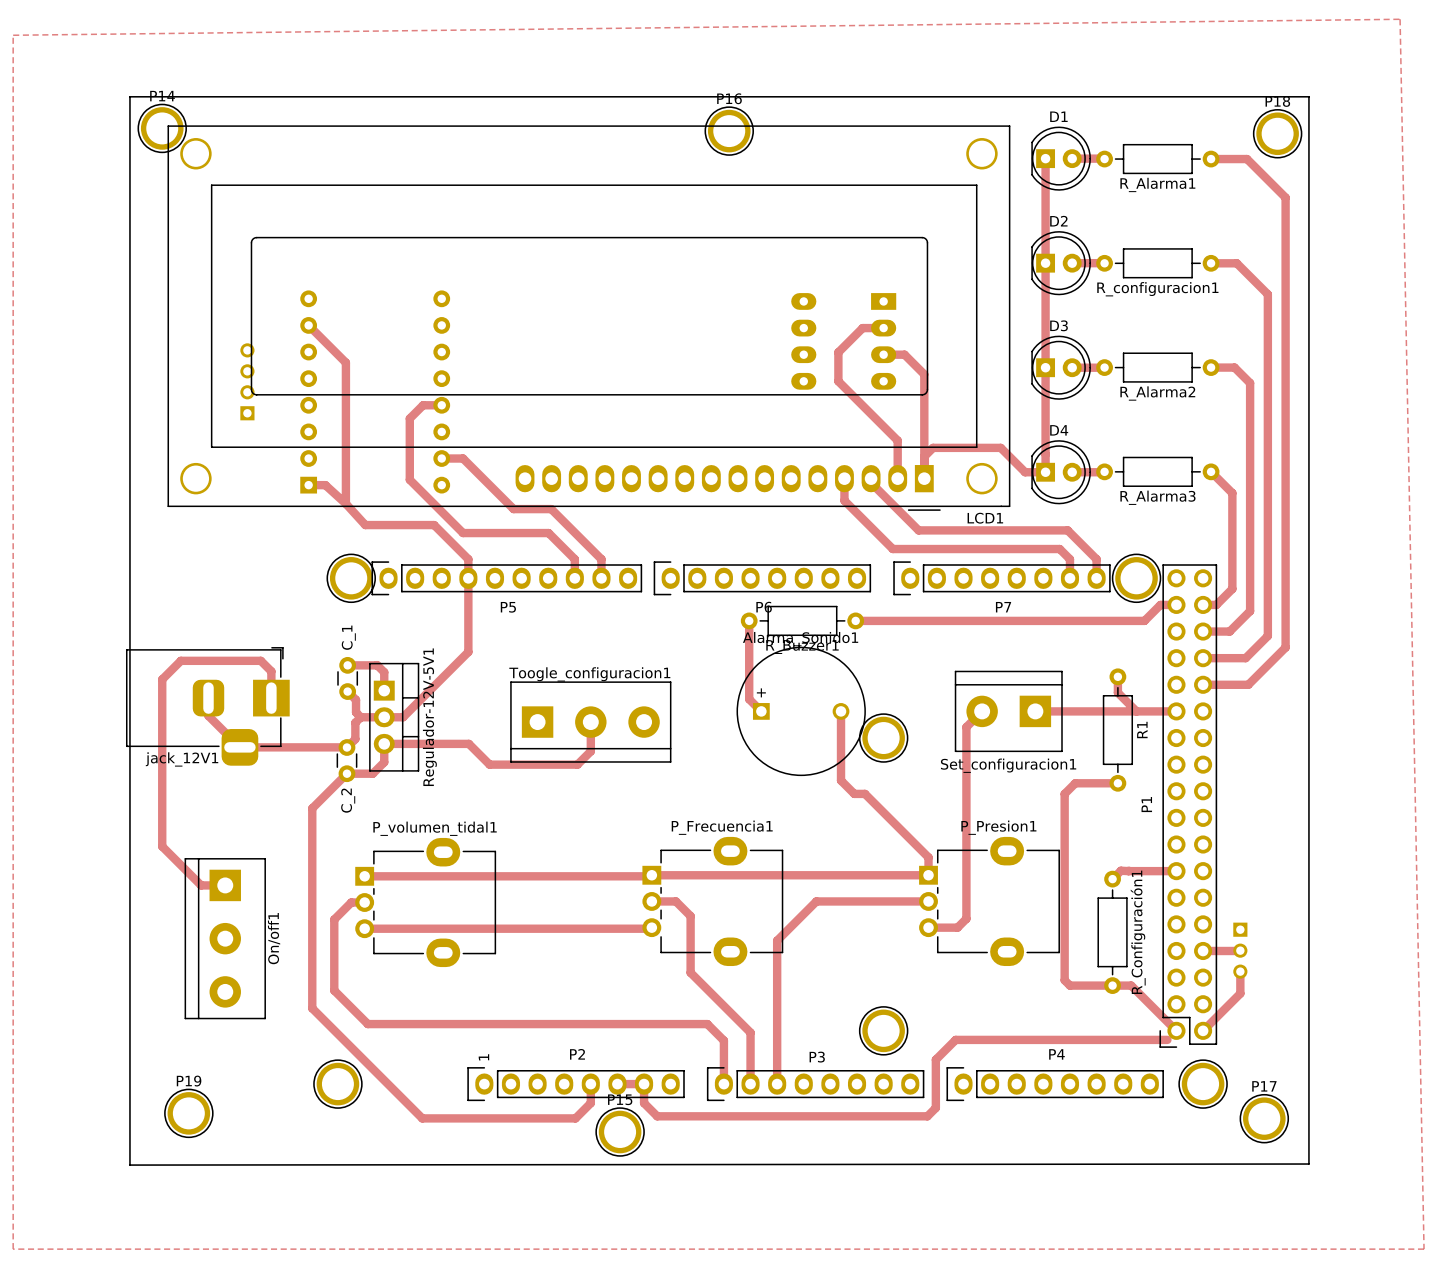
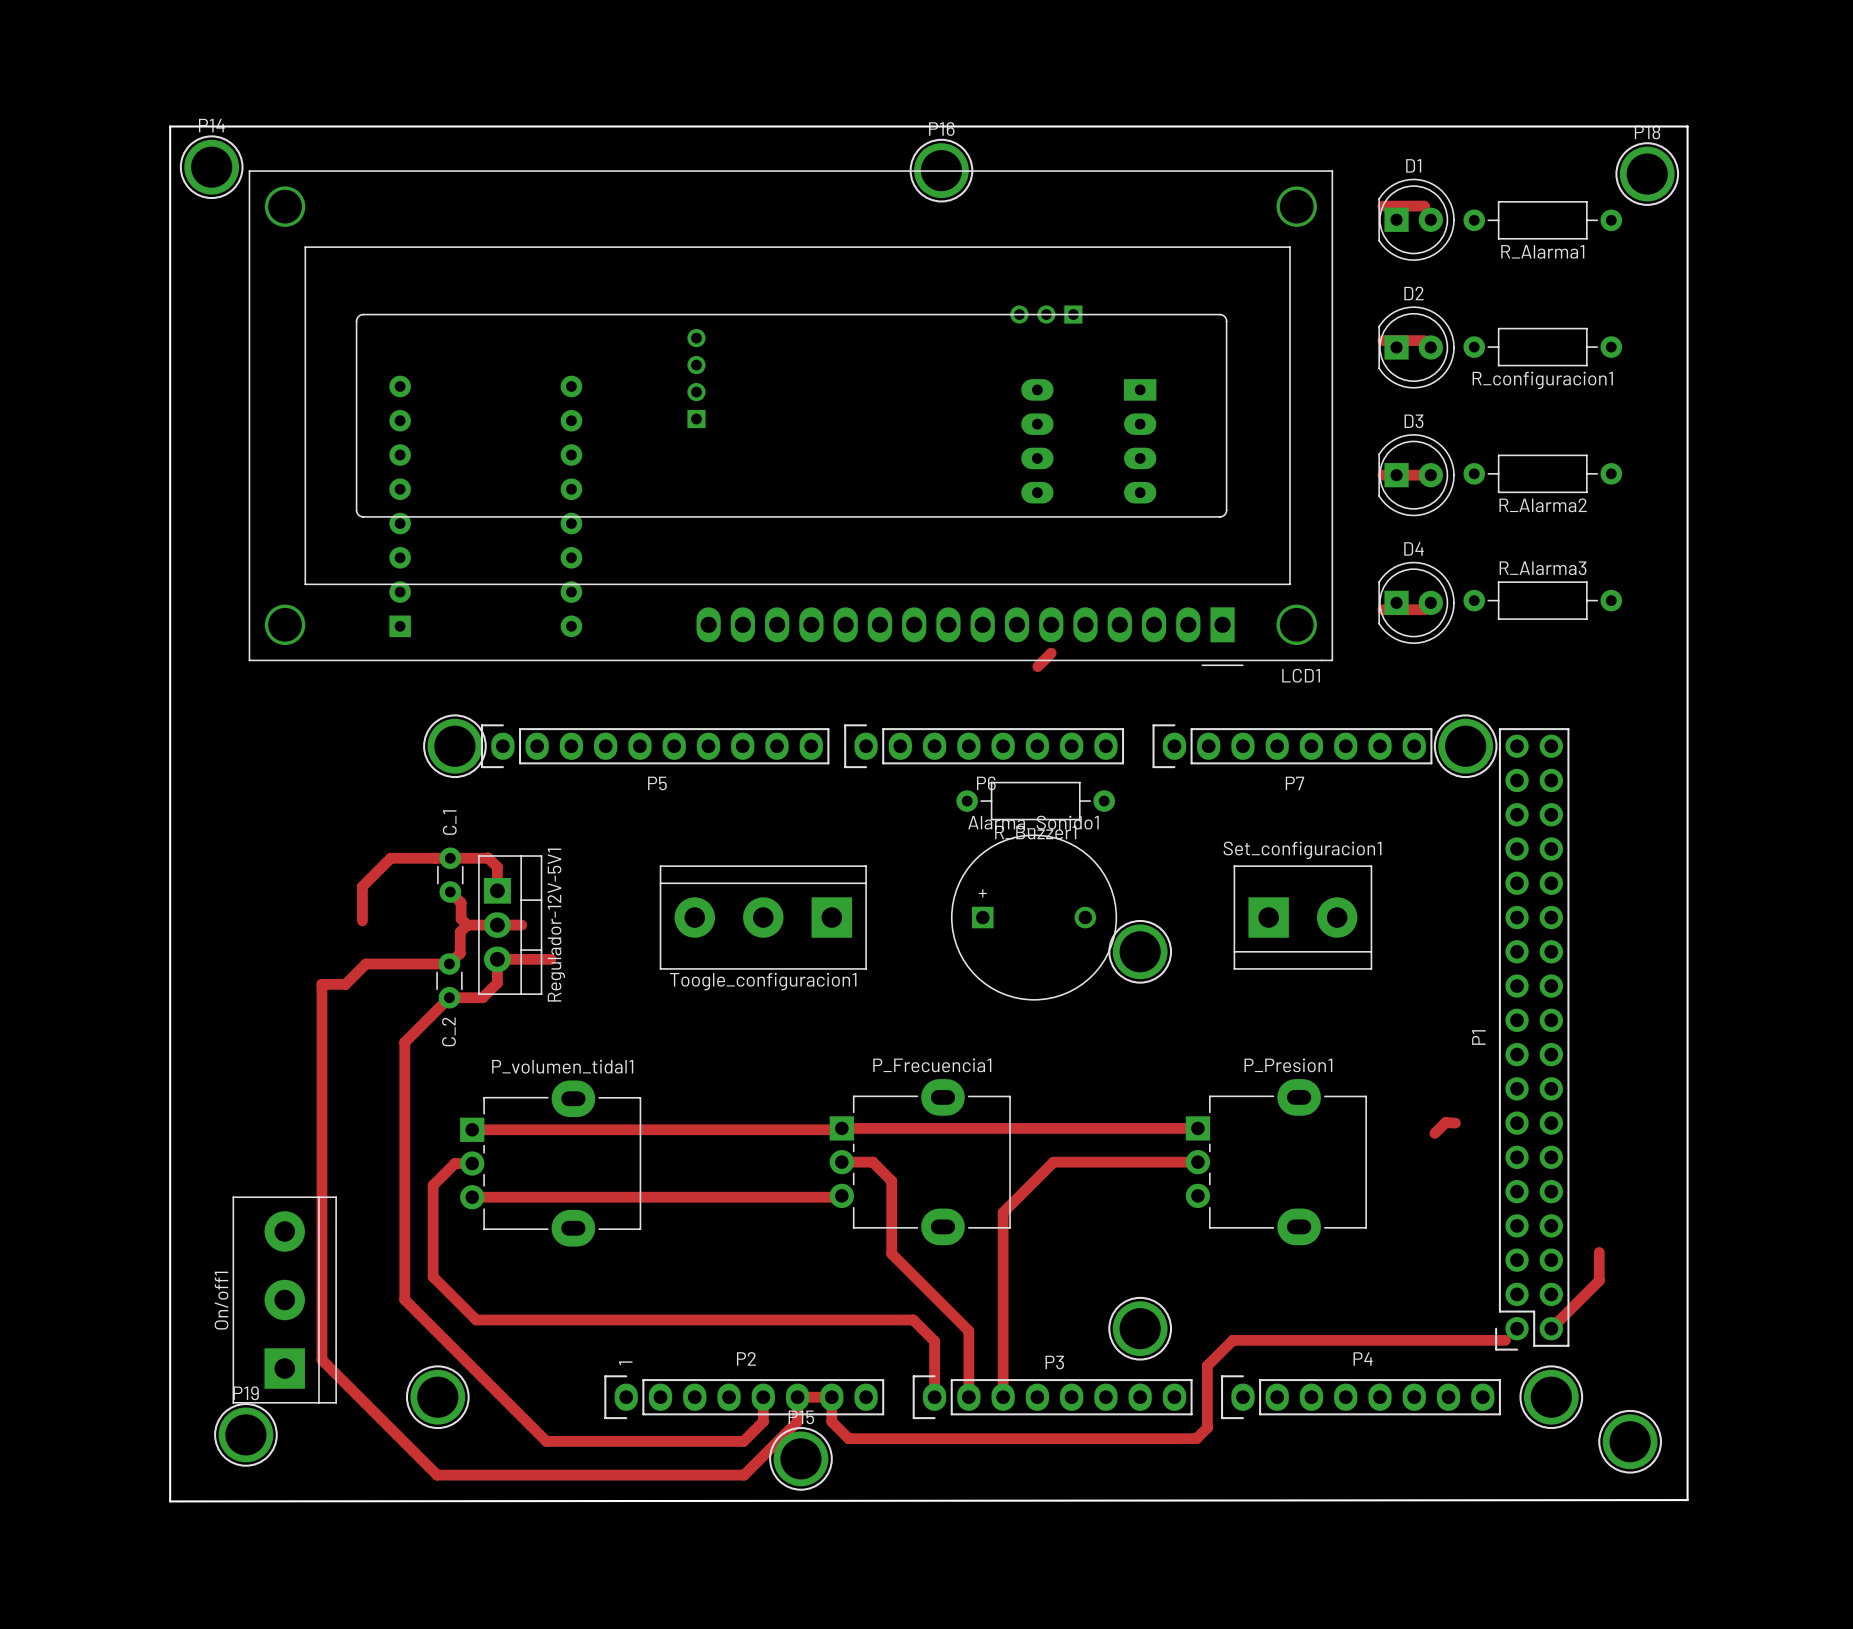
zone outline: (1400, 19) (13, 35) (13, 1249) (1424, 1249) (1400, 19) -> none
track: (1045, 158) (1045, 472) (1025, 472) (1000, 447) (933, 447) (924, 456) -> none
D1 position: (1061, 158) -> (1416, 219)
R_Alarma1 position: (1157, 159) -> (1542, 220)
track: (1211, 159) (1247, 159) (1285, 197) (1285, 647) (1248, 684) (1203, 684) -> none
part: none -> (1046, 314)
D2 position: (1061, 263) -> (1416, 347)
R_configuracion1 position: (1157, 263) -> (1542, 347)
track: (1211, 263) (1236, 263) (1267, 294) (1267, 635) (1245, 658) (1203, 658) -> none
part: none -> (696, 378)
LCD1 position: (588, 318) -> (790, 418)
track: (308, 325) (345, 362) (345, 503) -> none
track: (883, 328) (862, 328) (838, 352) (838, 381) (897, 440) (897, 478) -> none
track: (883, 354) (904, 354) (924, 374) (924, 478) -> none
D3 position: (1061, 367) -> (1416, 475)
R_Alarma2 position: (1157, 367) -> (1542, 473)
track: (1211, 367) (1234, 367) (1250, 383) (1250, 611) (1229, 631) (1203, 631) -> none
part: (247, 381) -> none
track: (441, 405) (423, 405) (409, 418) (409, 479) (463, 533) (548, 533) (574, 559) (574, 578) -> none
track: (441, 458) (463, 458) (513, 509) (551, 509) (601, 559) (601, 578) -> none
R_Alarma3 position: (1157, 471) -> (1542, 600)
track: (1211, 471) (1232, 493) (1232, 588) (1216, 604) (1203, 604) -> none
D4 position: (1061, 472) -> (1416, 602)
track: (844, 478) (844, 500) (892, 549) (1059, 549) (1069, 559) (1069, 578) -> none
track: (871, 478) (871, 482) (918, 530) (1067, 530) (1096, 559) (1096, 578) -> none
track: (308, 485) (325, 485) (345, 503) -> none
R_Alarma3 name position: R_Alarma3 (1157, 497) -> R_Alarma3 (1543, 568)
track: (345, 503) (365, 525) (434, 525) (468, 559) (468, 652) (403, 717) -> none
track: none -> (1051, 653) (1037, 666)
track: (1176, 604) (1160, 604) (1144, 620) (855, 620) -> none
track: (749, 620) (749, 699) (761, 711) -> none
track: none -> (450, 858) (390, 858) (362, 886) (362, 920)
track: (1117, 676) (1117, 692) (1136, 711) -> none
track: (208, 698) (208, 715) (239, 747) (346, 747) -> (797, 1397) (797, 1421) (744, 1475) (437, 1475) (321, 1359) (321, 984) (345, 984) (365, 963) (449, 963)
track: (271, 698) (271, 671) (260, 660) (180, 660) (162, 679) (162, 846) (201, 885) (225, 885) -> none
jack_12V1: (207, 706) -> none
track: (841, 711) (841, 780) (854, 793) (864, 793) (928, 857) (928, 875) -> none
track: (982, 711) (966, 727) (966, 918) (957, 927) (928, 927) -> none
Set_configuracion1 rotation: 0° (1008, 711) -> 180° (1302, 917)
track: (1035, 711) (1176, 711) -> none
track: (590, 722) (590, 751) (577, 764) (489, 764) (468, 743) (425, 743) -> none
Toogle_configuracion1 rotation: 0° (590, 722) -> 180° (763, 917)
R1: (1117, 730) -> none
track: (1117, 783) (1075, 783) (1064, 793) (1064, 980) (1069, 985) (1131, 985) (1176, 1030) -> none
track: (1128, 870) (1176, 871) -> none
R_Configuración1: (1112, 932) -> none
On/off1 rotation: 0° (225, 938) -> 180° (284, 1300)
track: (1240, 950) (1203, 950) -> none
part: (1240, 950) -> none
P17 name: P17 (1264, 1086) -> none

